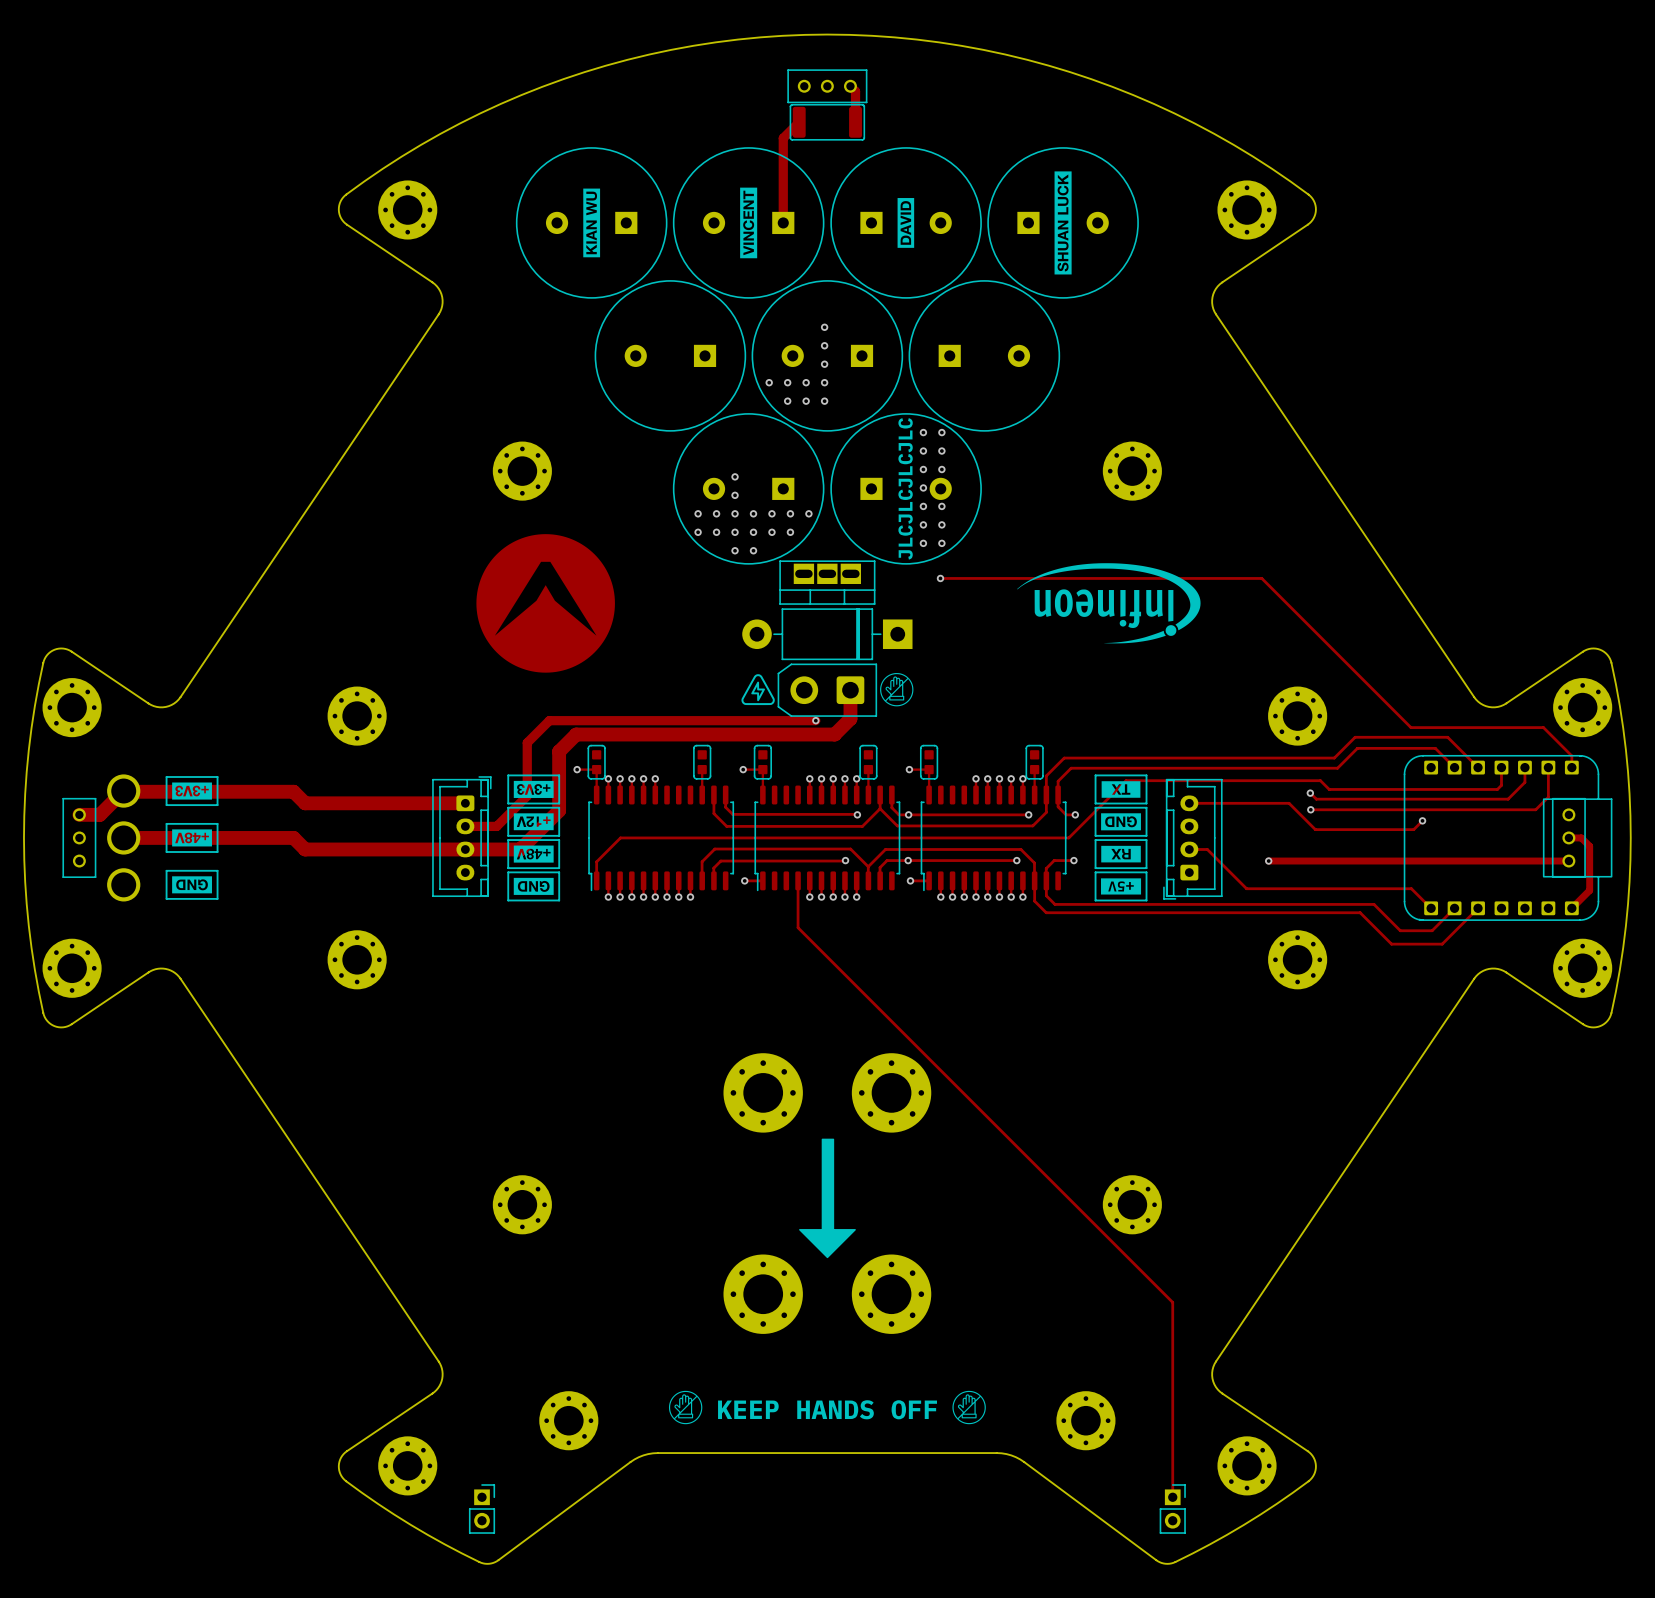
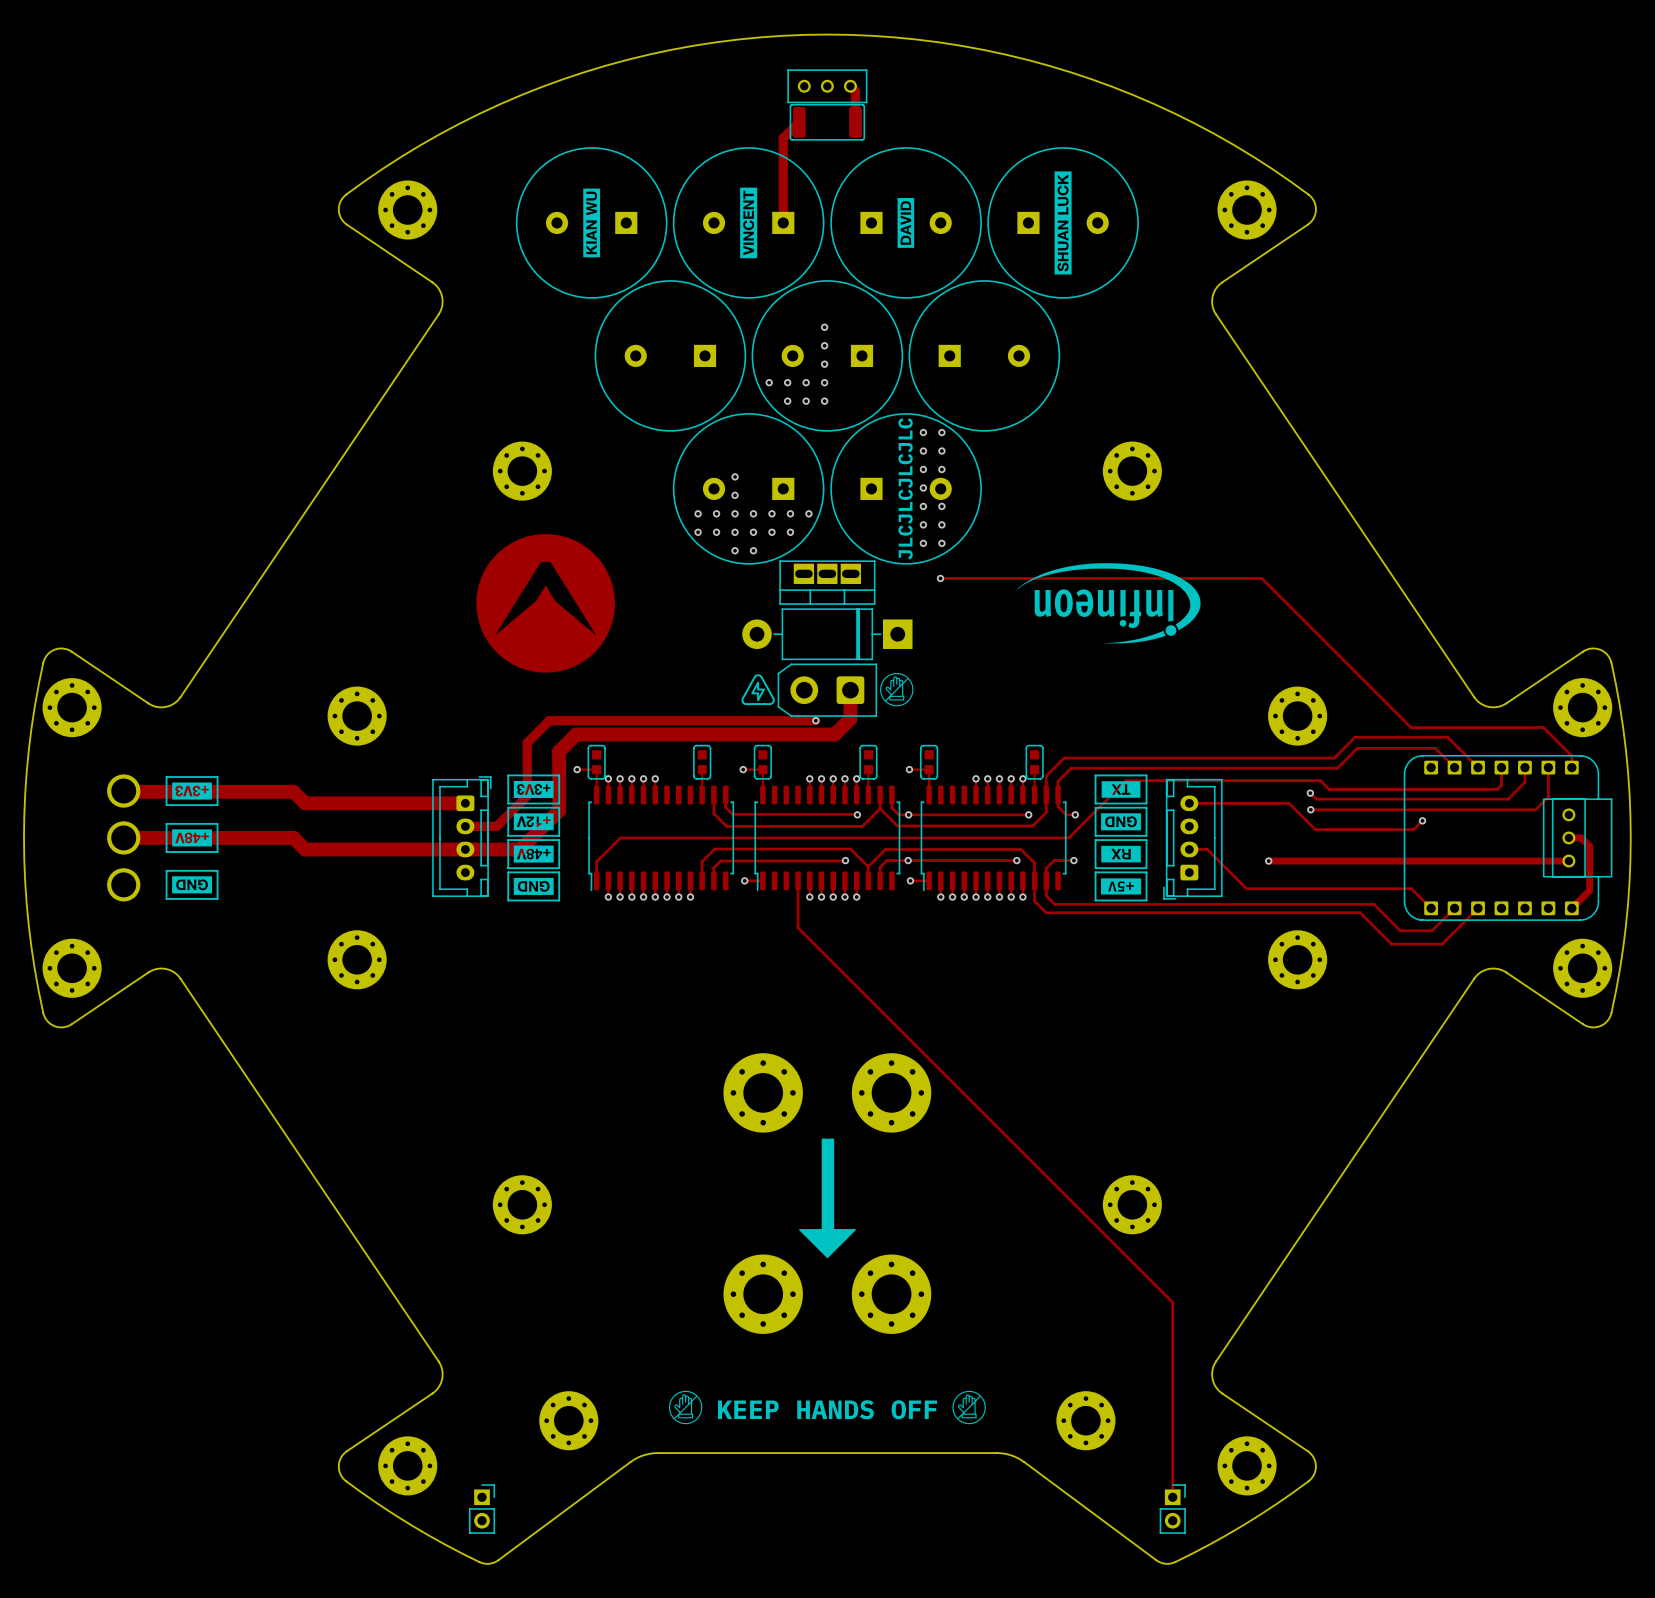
track: (123, 791) (99, 814) (79, 814) -> none
part: (79, 837) -> none

